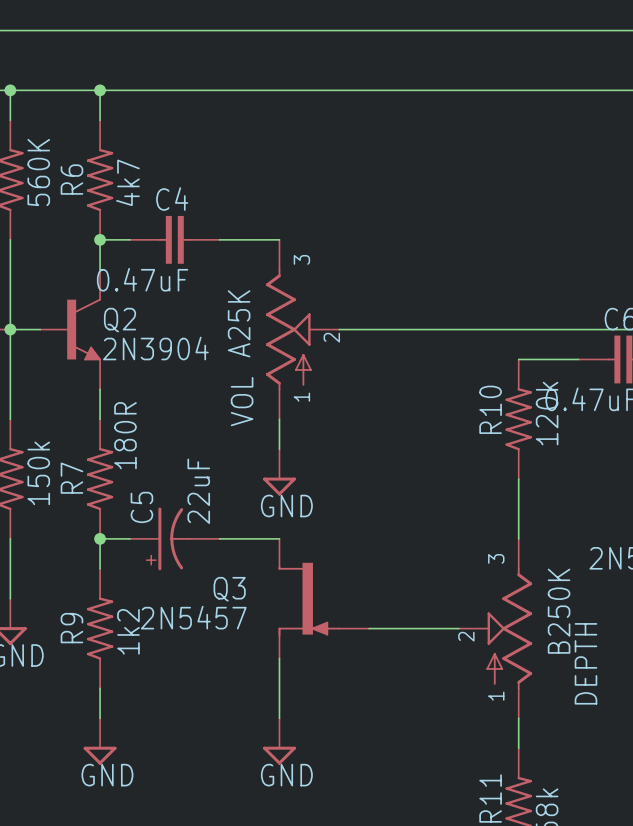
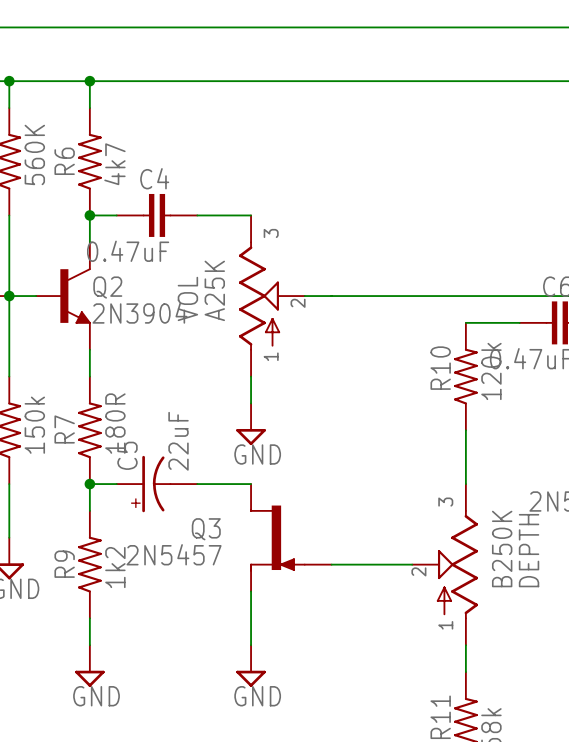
VOL name position: VOL (242, 401) -> VOL (187, 298)
R7 value position: 180R (125, 435) -> 180R (115, 423)
DEPTH name position: DEPTH (585, 663) -> DEPTH (529, 550)

